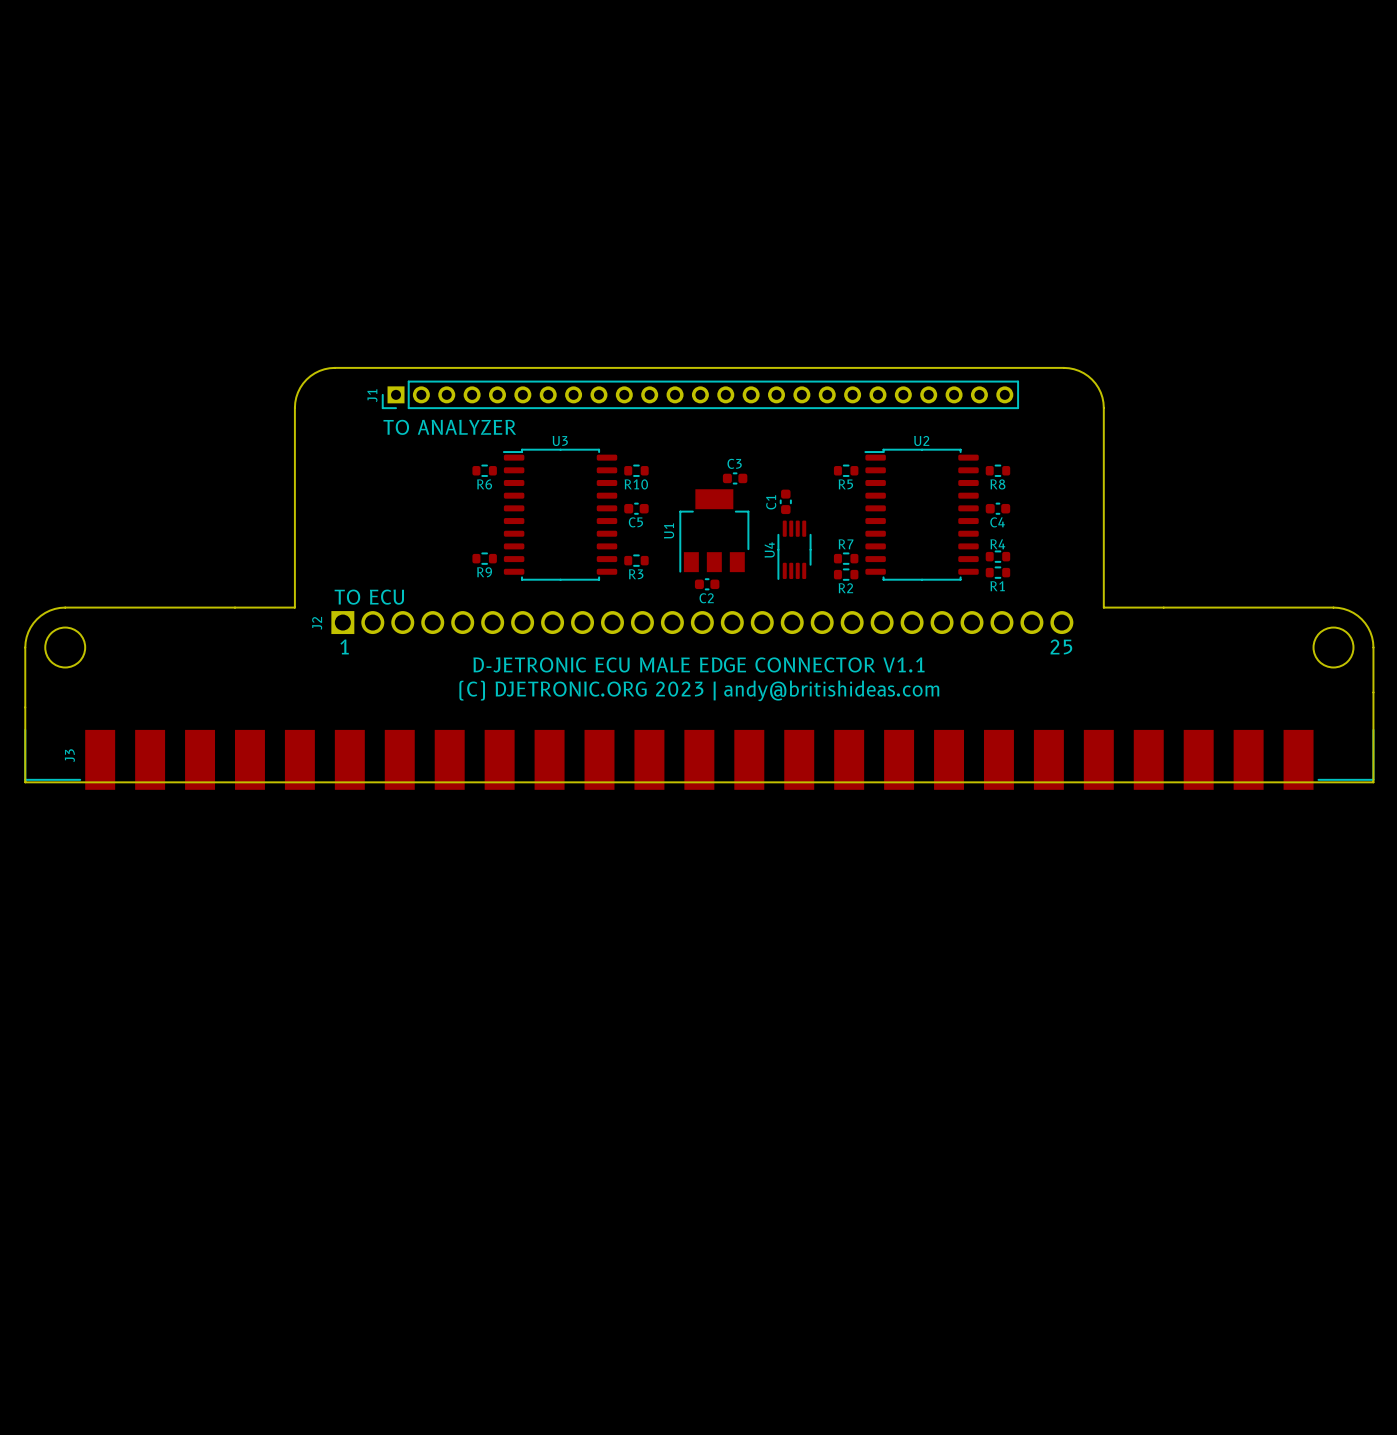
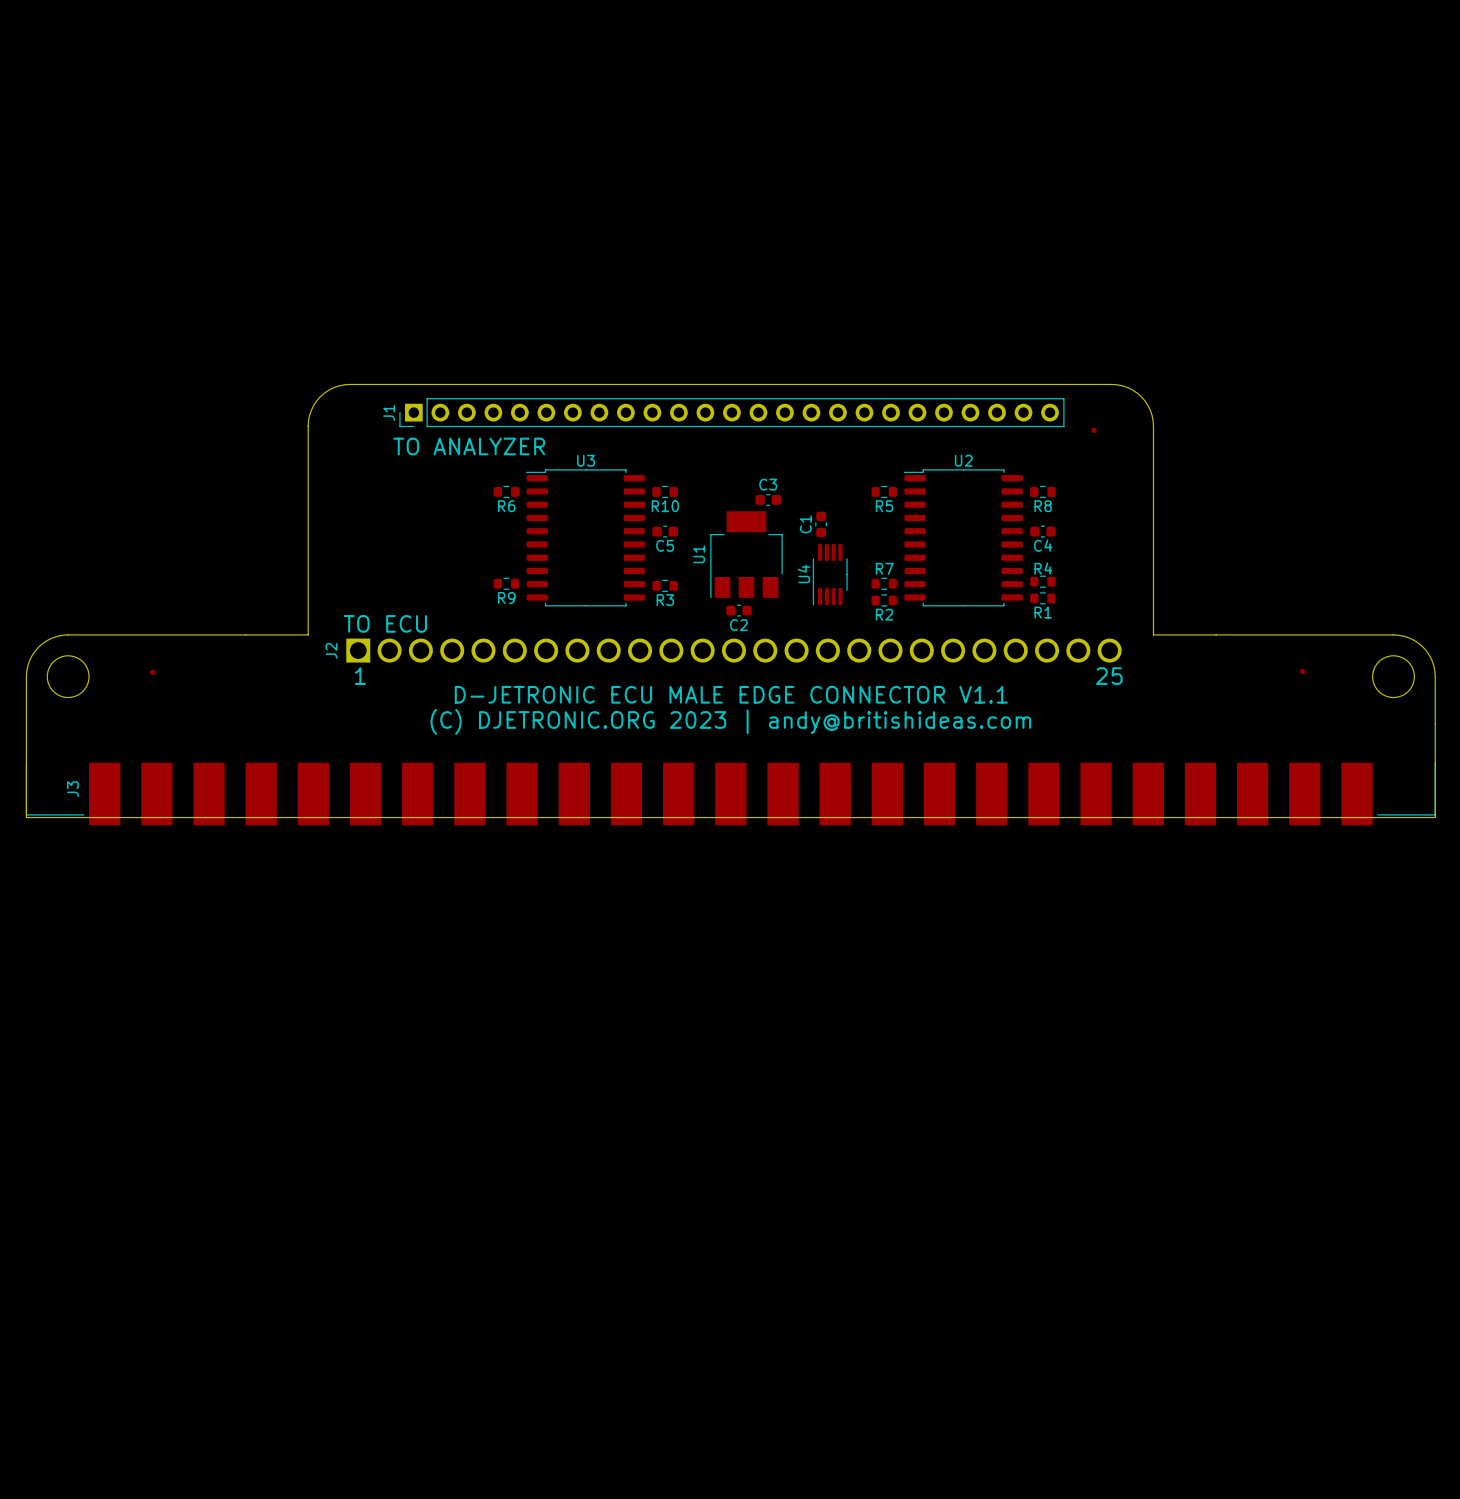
part: none -> (1094, 430)
part: none -> (1302, 671)
part: none -> (152, 672)

